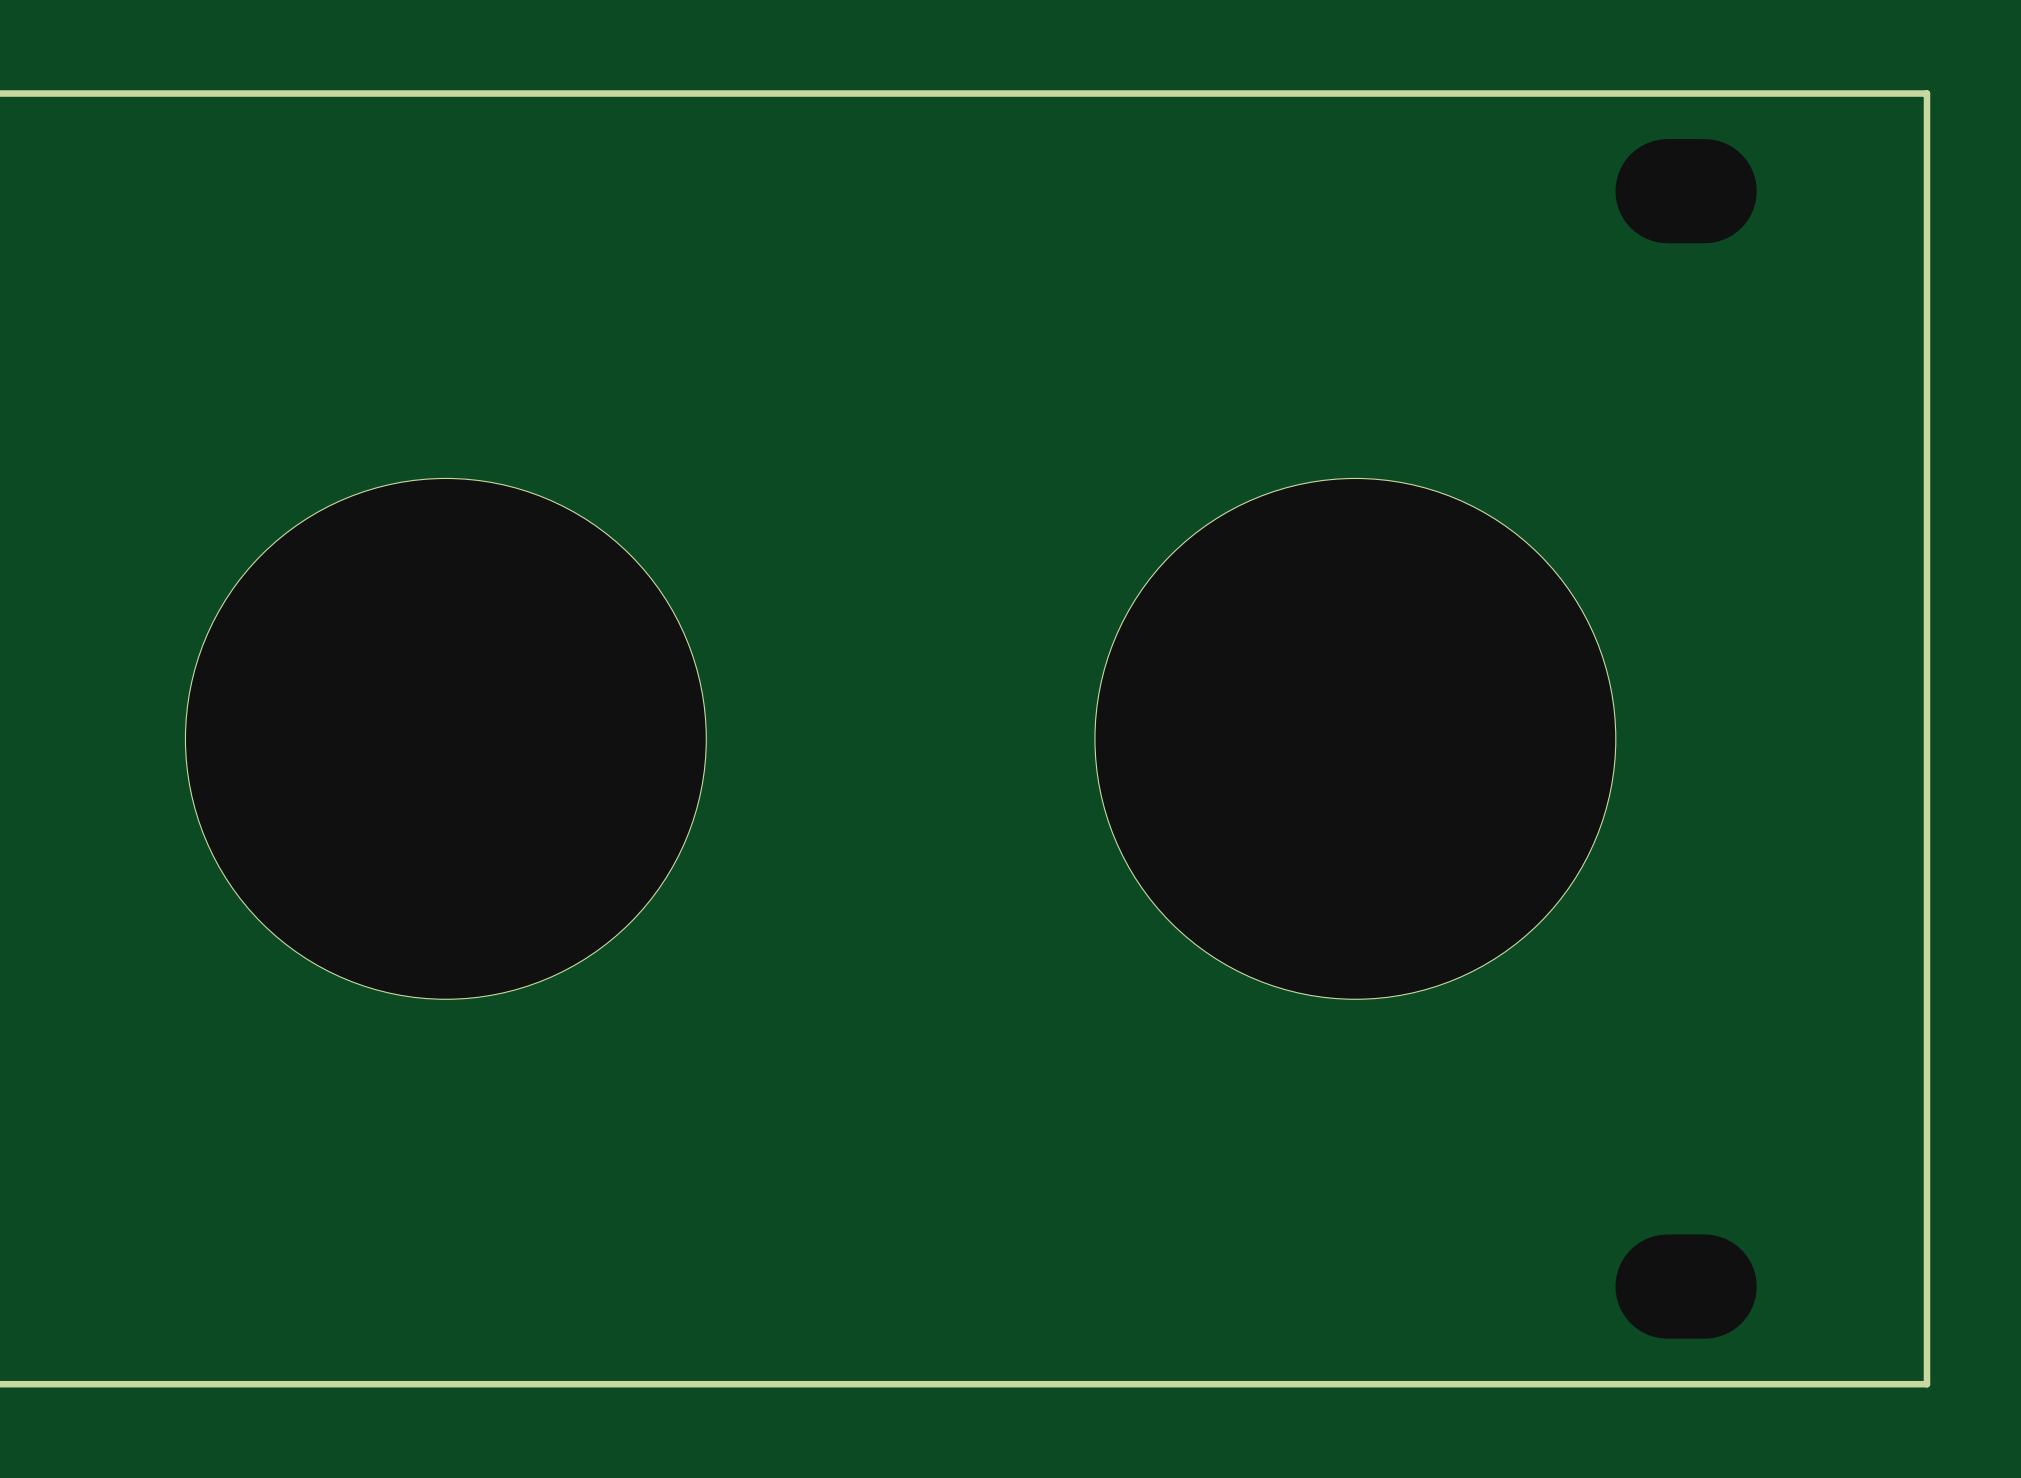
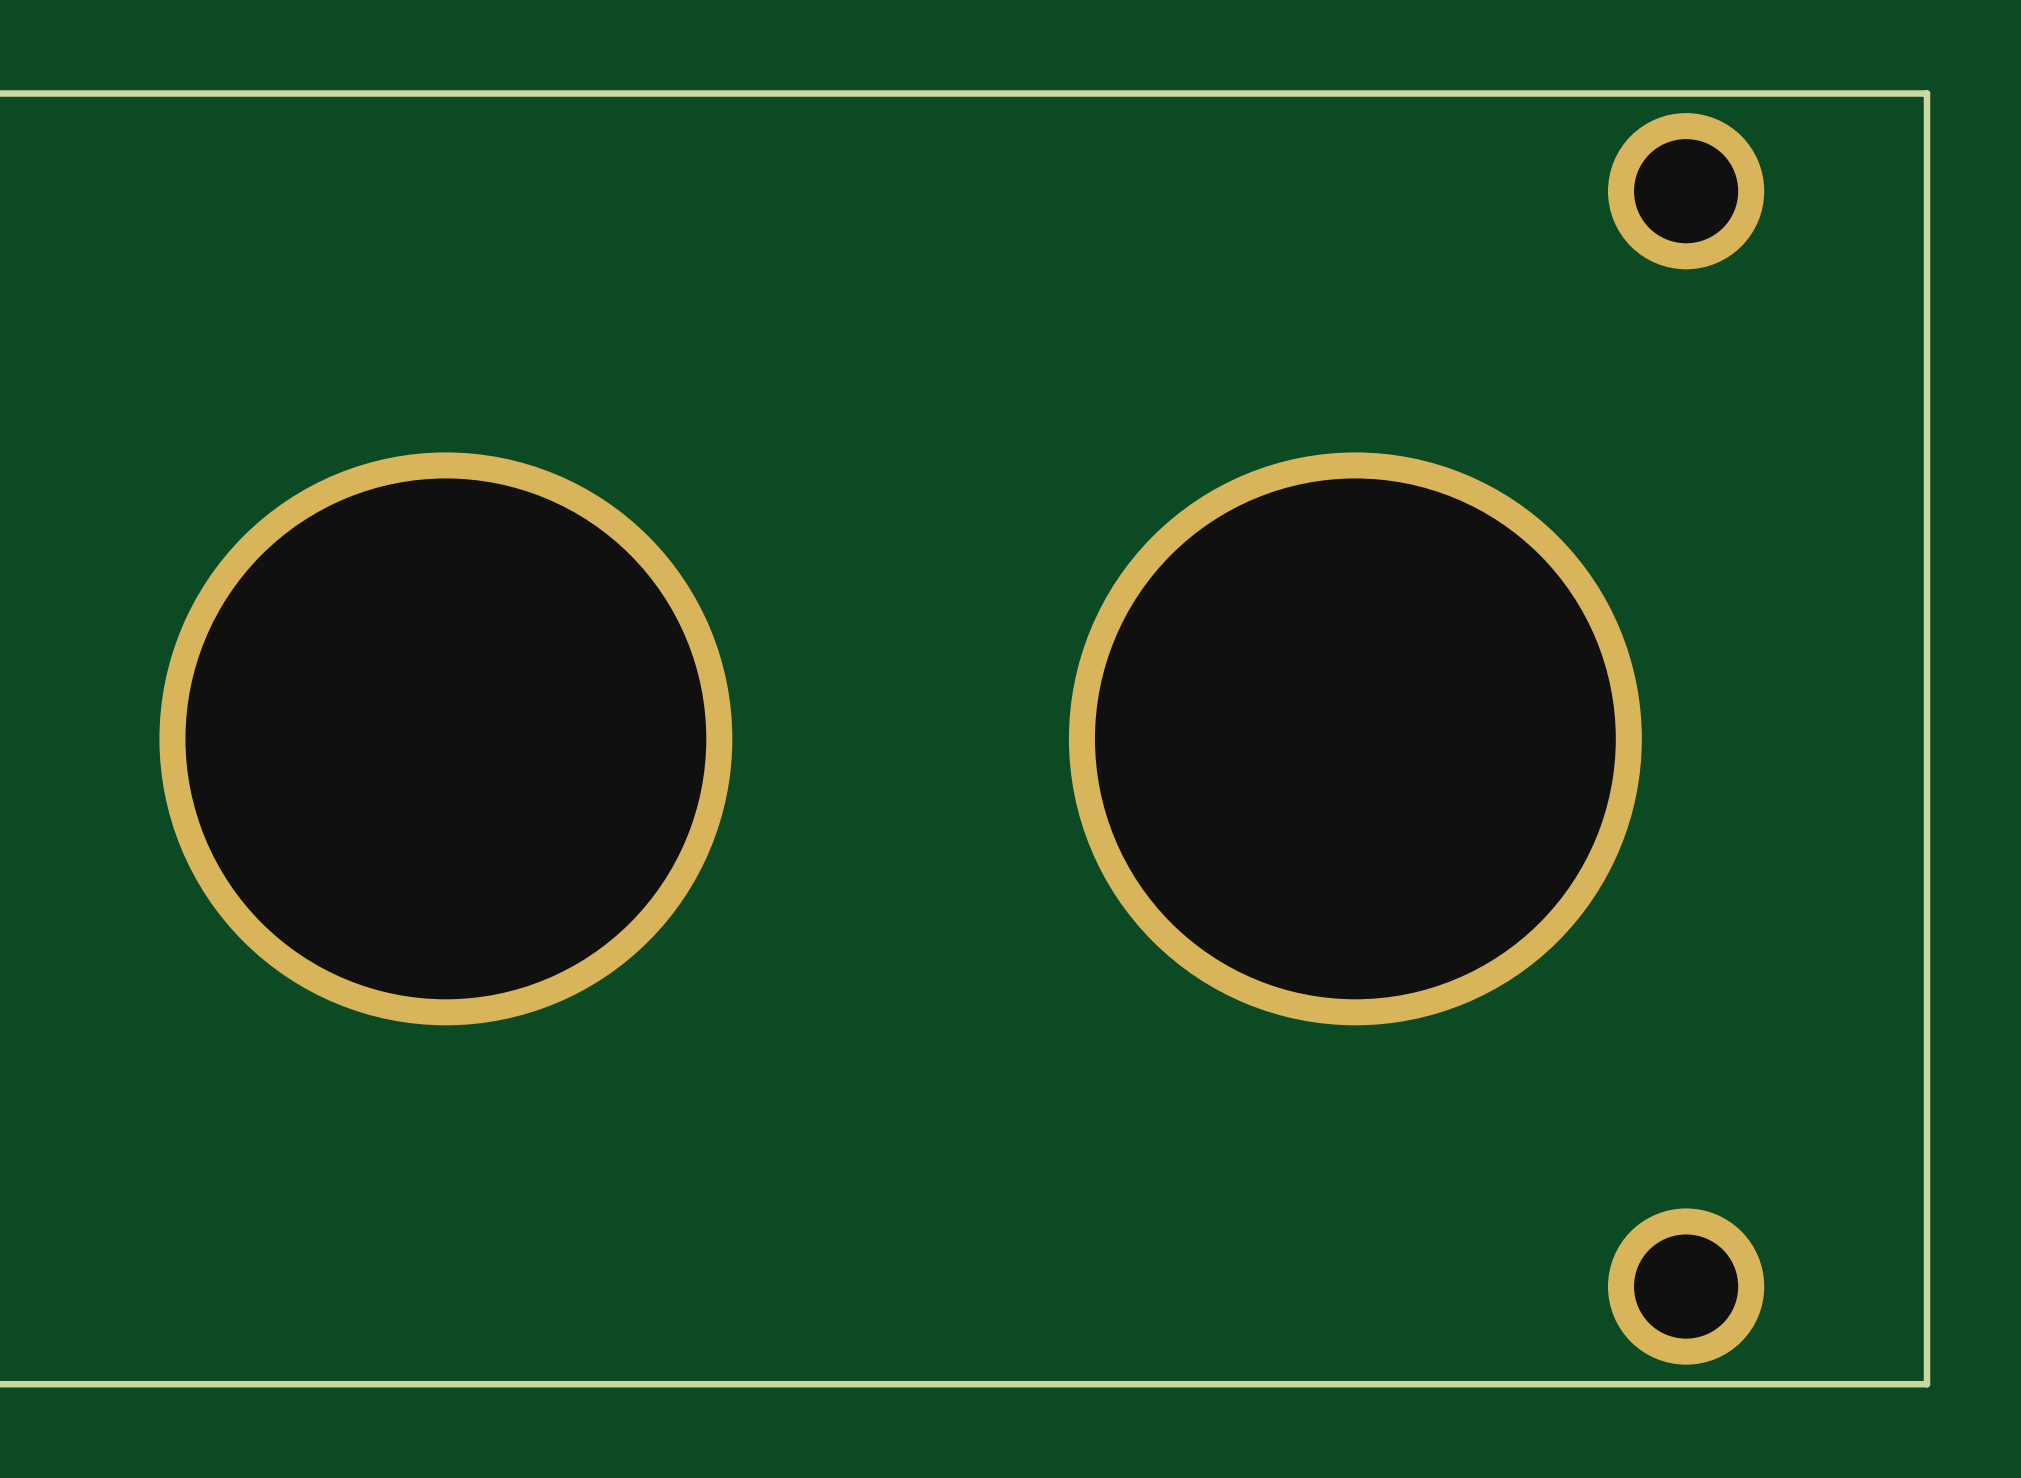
part footprint: [1615, 139, 1757, 244] -> [1607, 113, 1765, 270]
part footprint: [185, 478, 707, 1000] -> [159, 452, 733, 1026]
part footprint: [1094, 478, 1616, 1000] -> [1068, 452, 1642, 1026]
part footprint: [1615, 1234, 1757, 1339] -> [1607, 1208, 1765, 1365]

